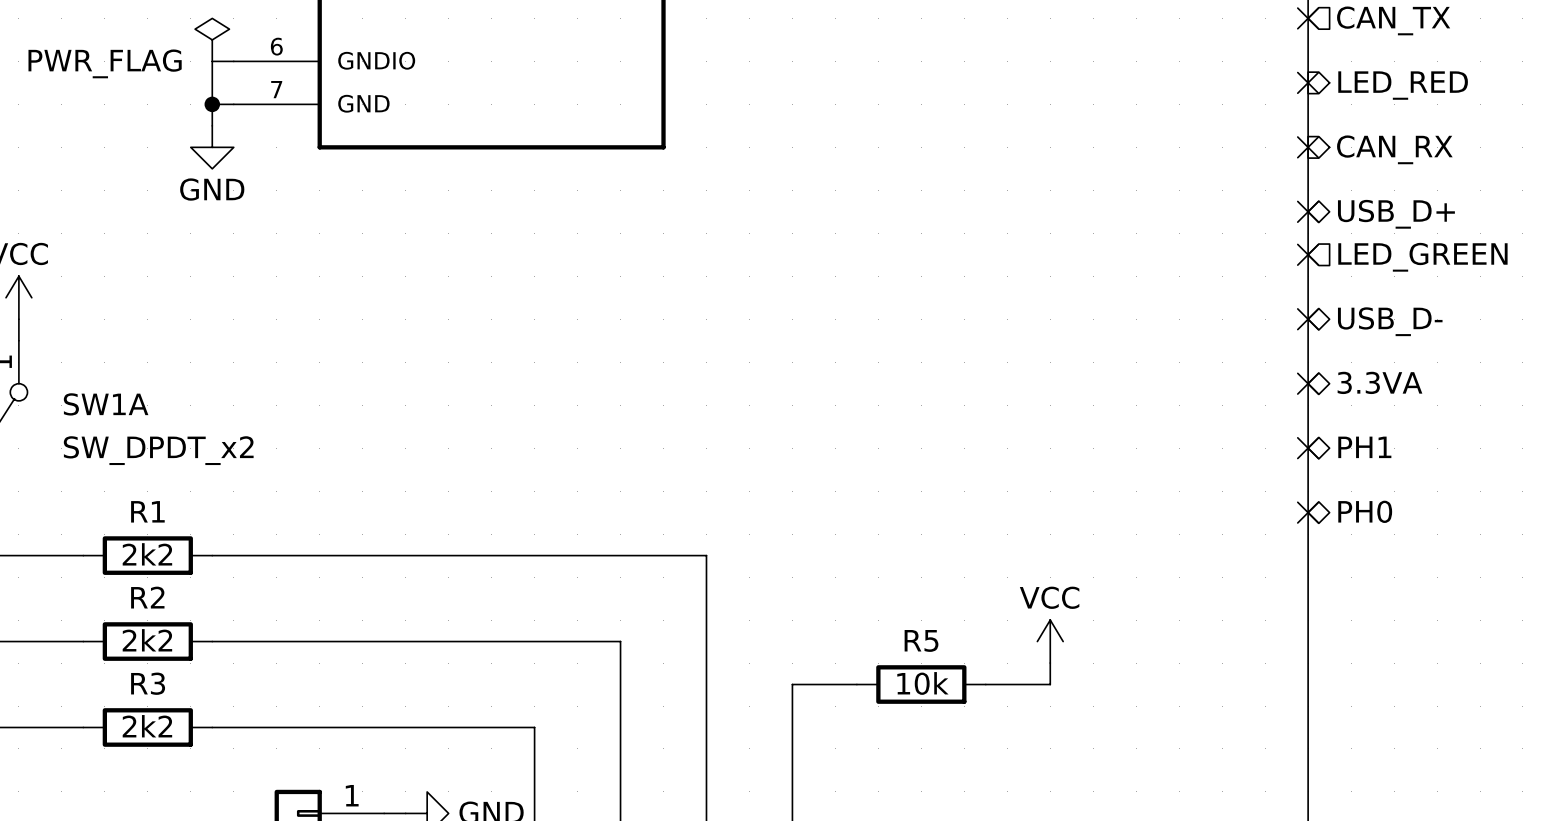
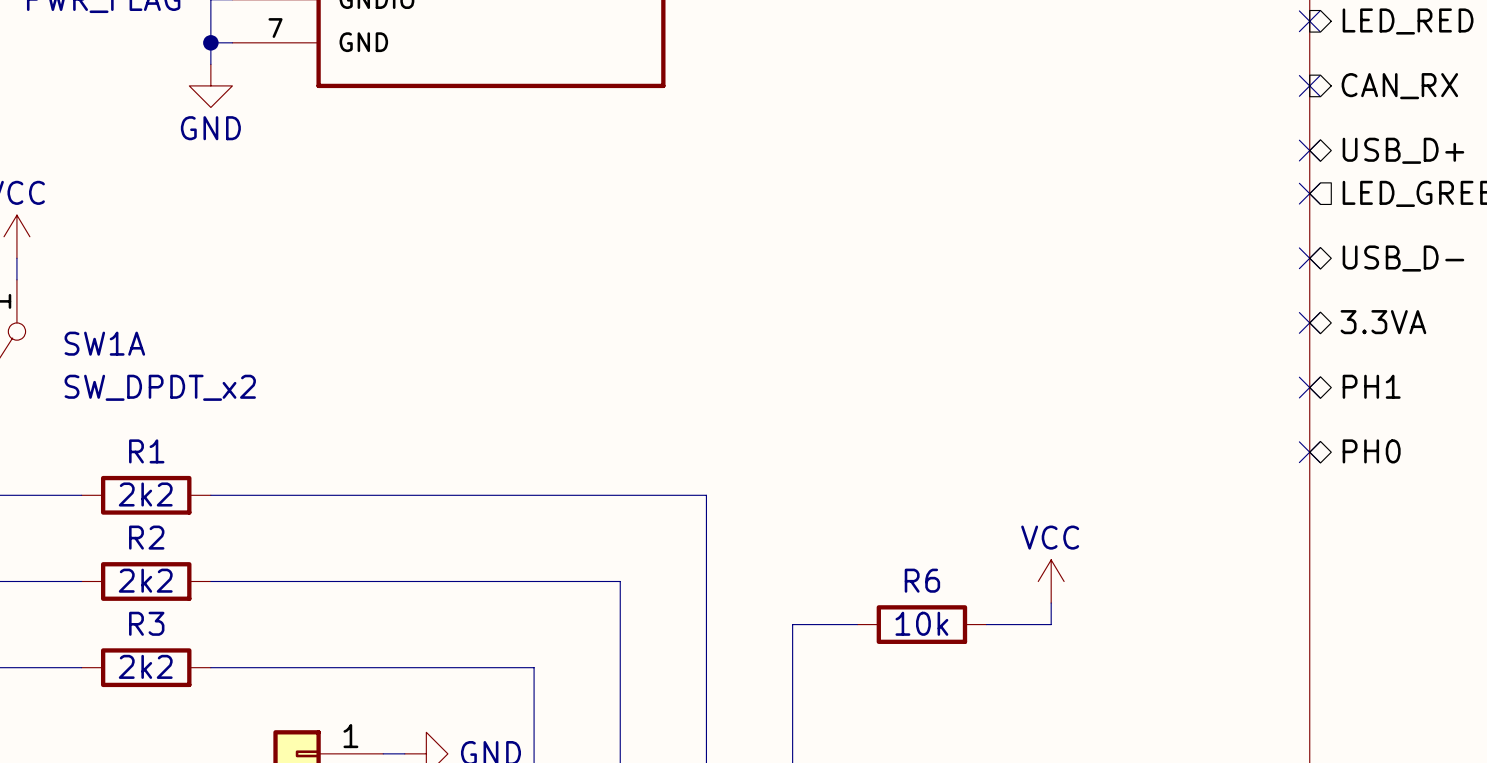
R5 name: R5 (921, 640) -> R6 (922, 580)

